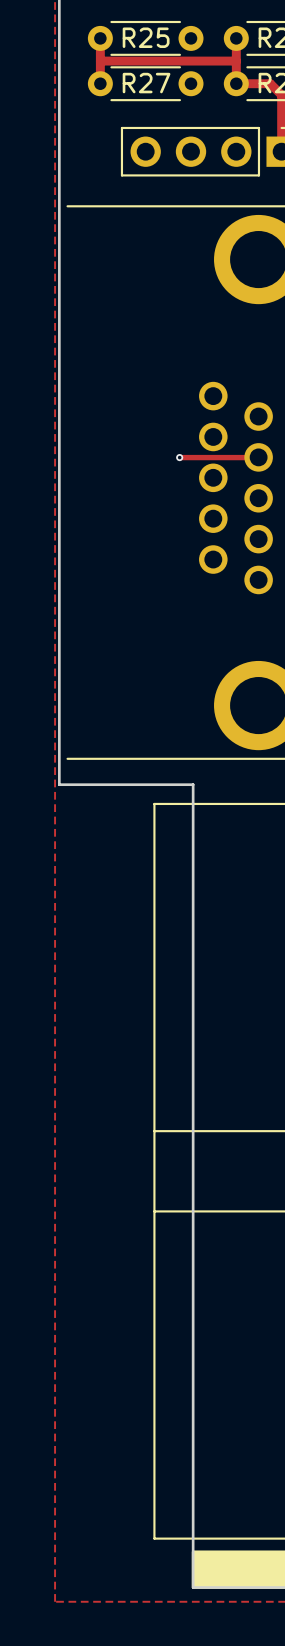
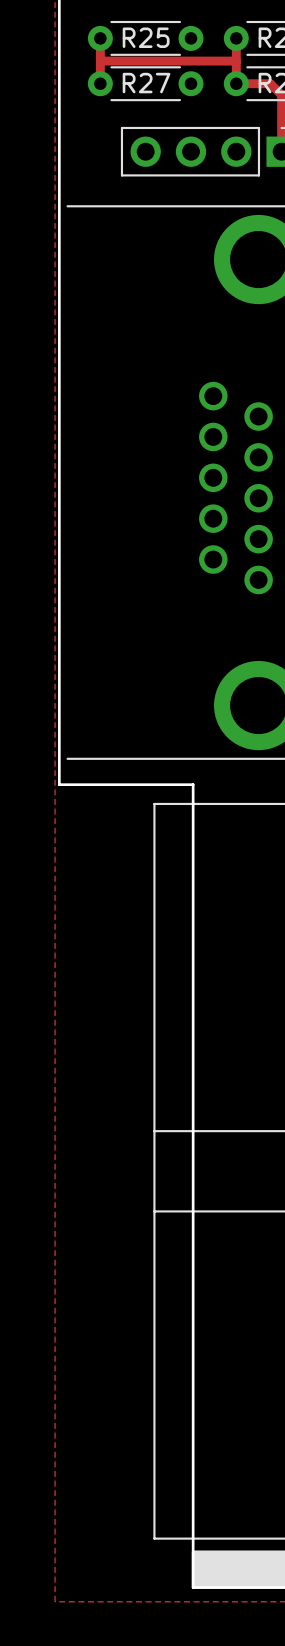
track: (179, 457) (258, 457) -> none
via: (179, 457) -> none

